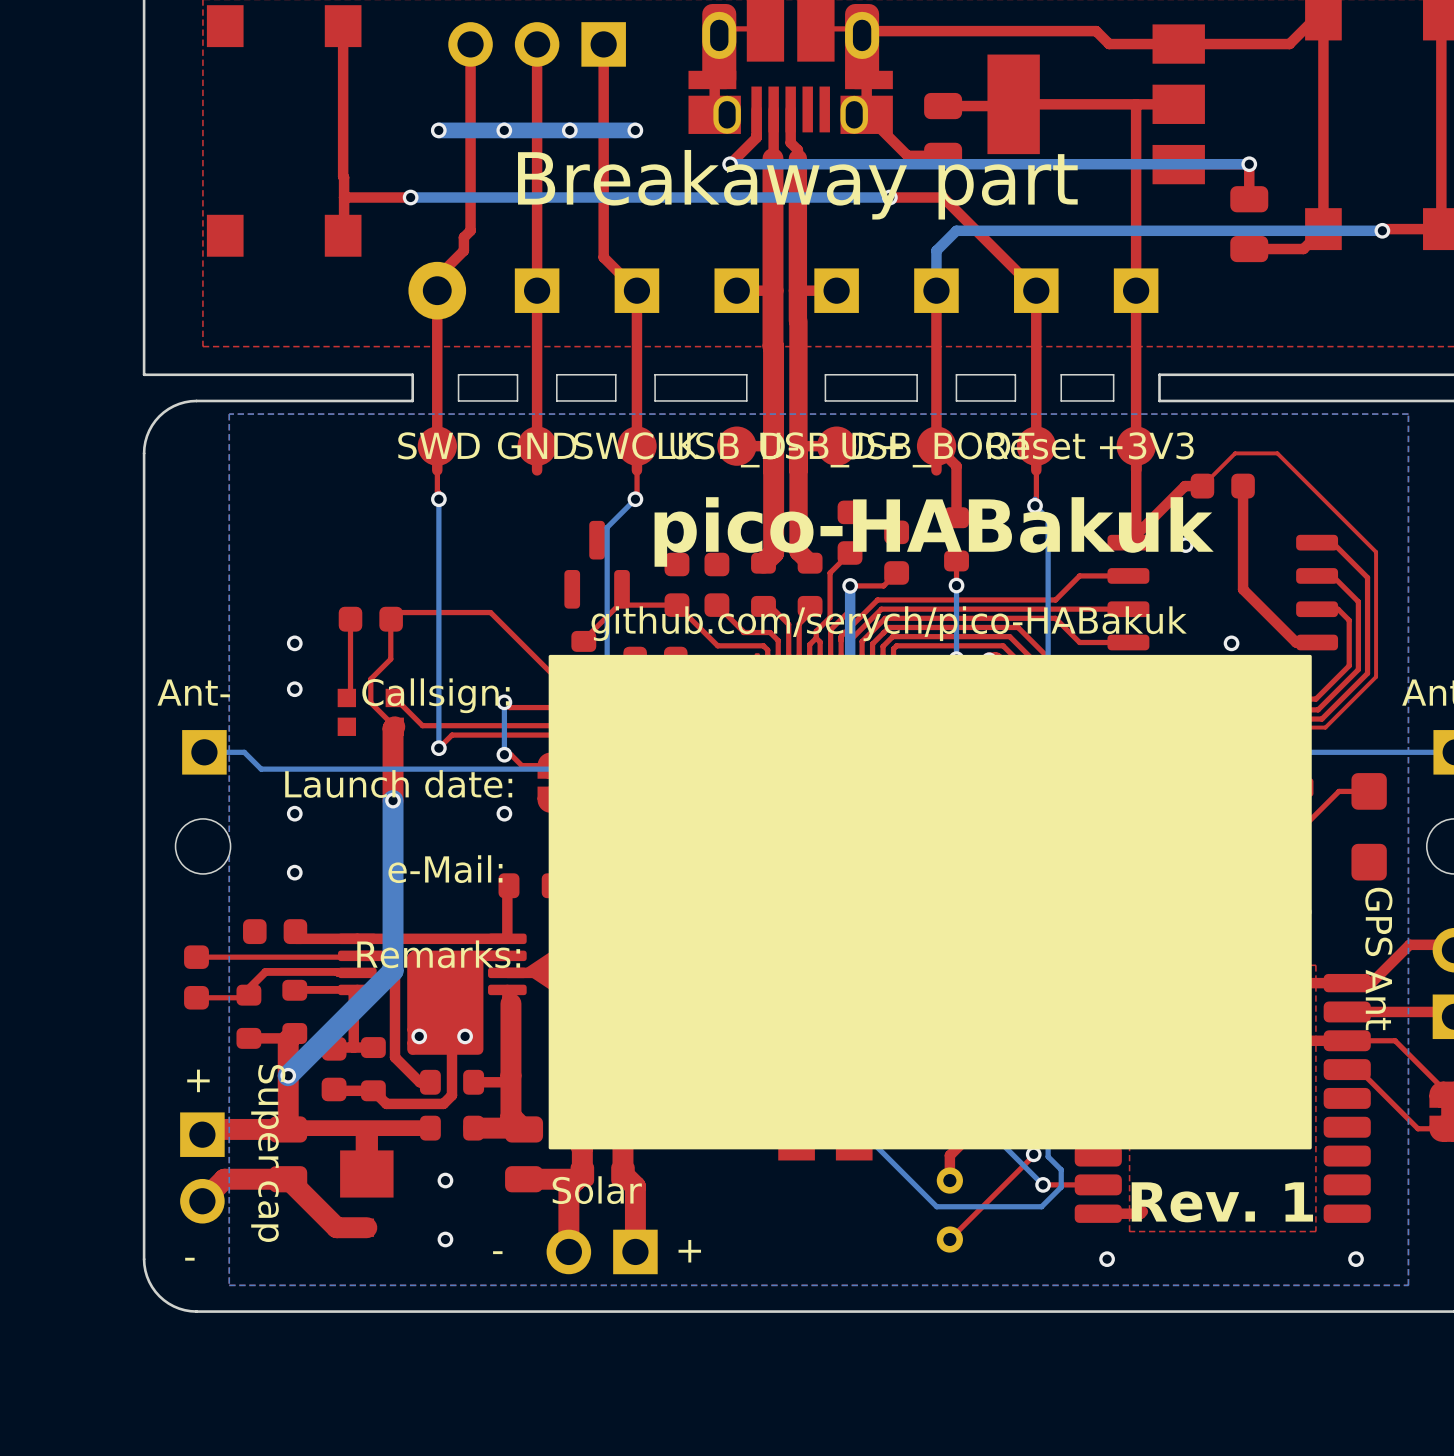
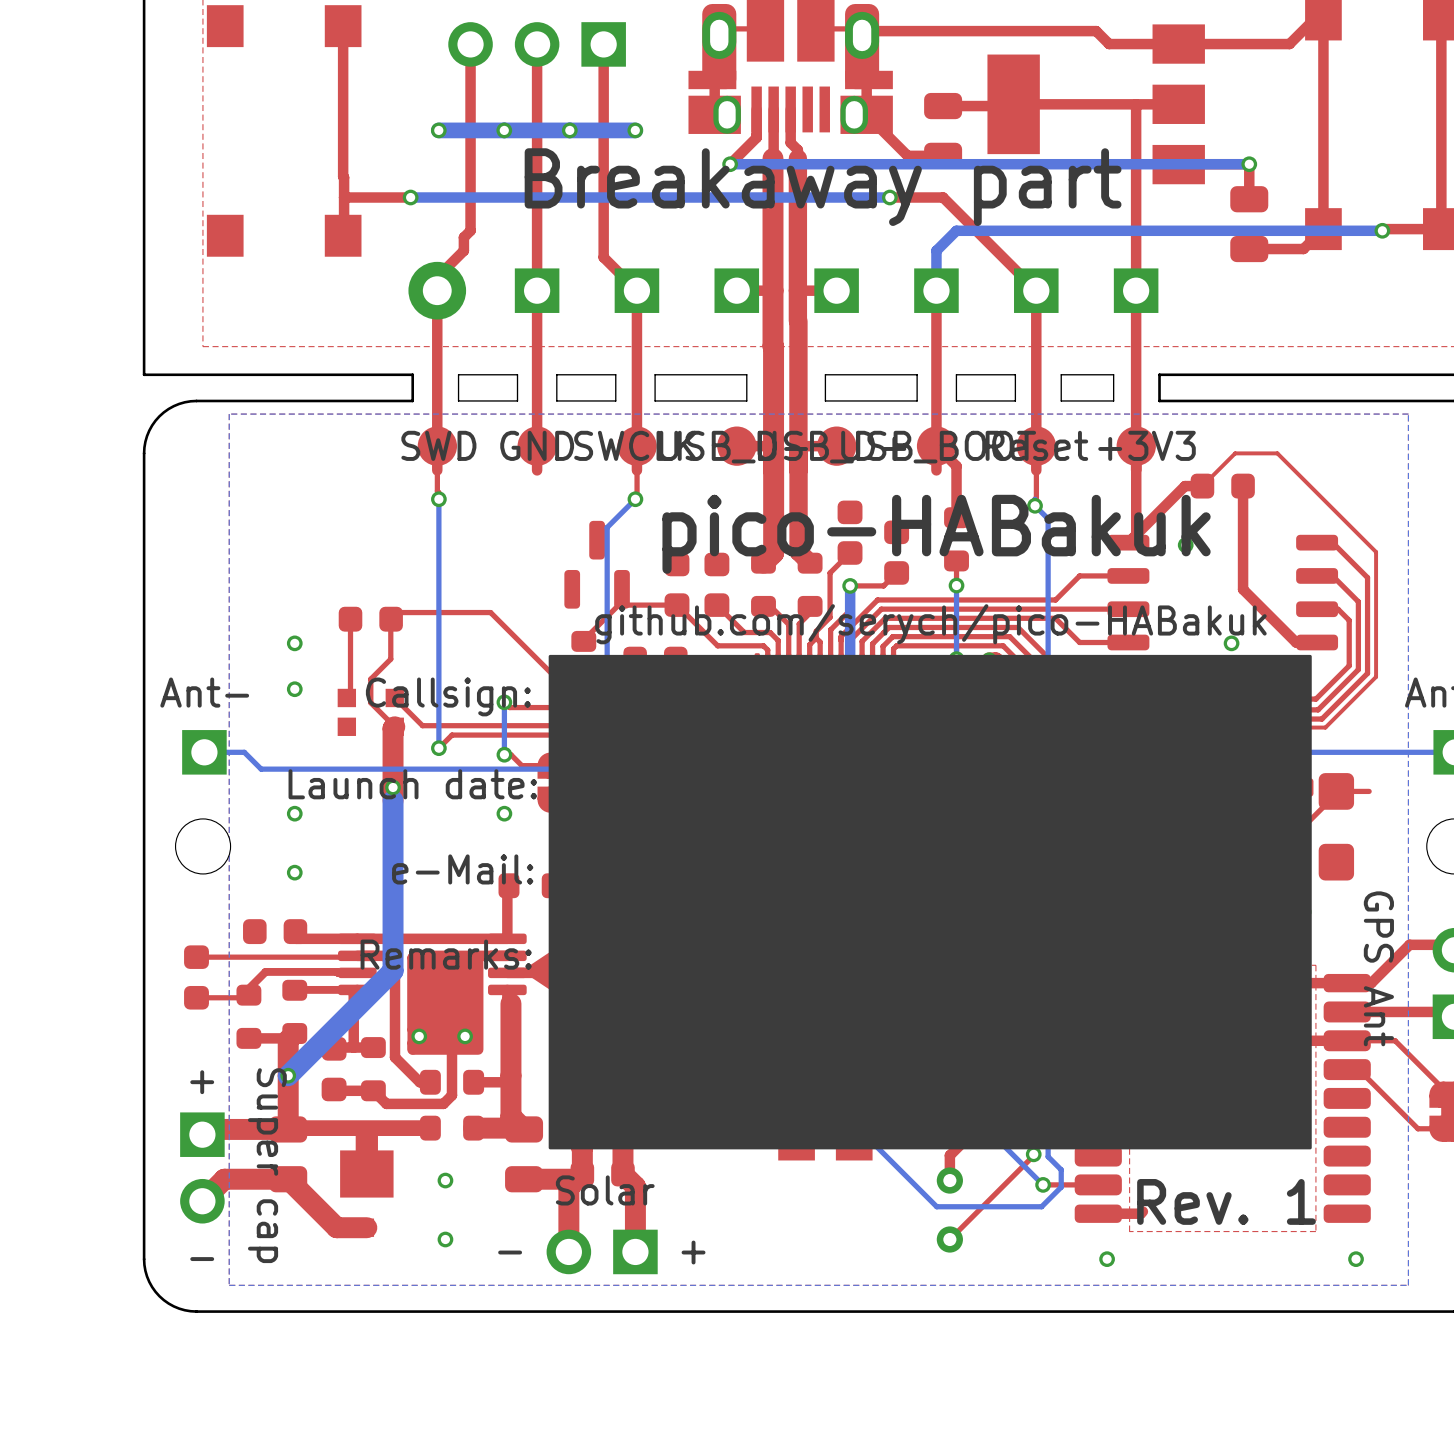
via position: (393, 800) -> (393, 787)
part position: (1369, 826) -> (1336, 826)

